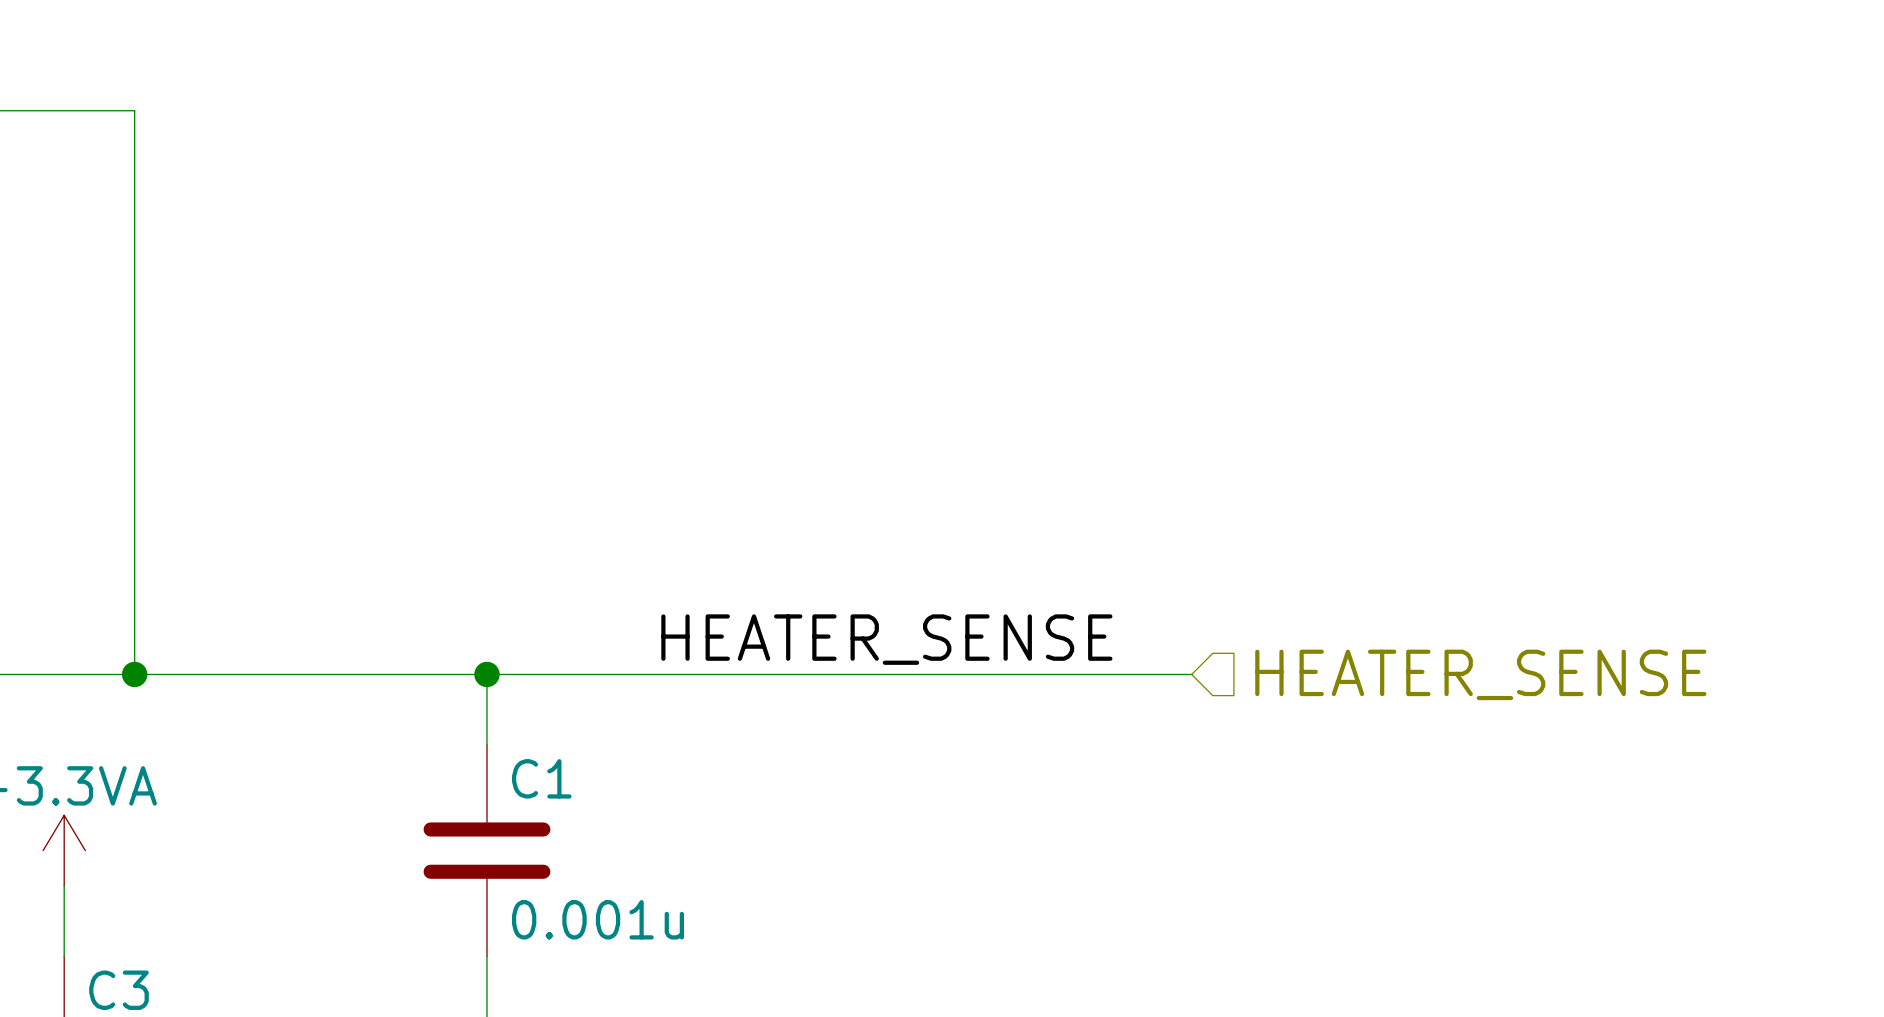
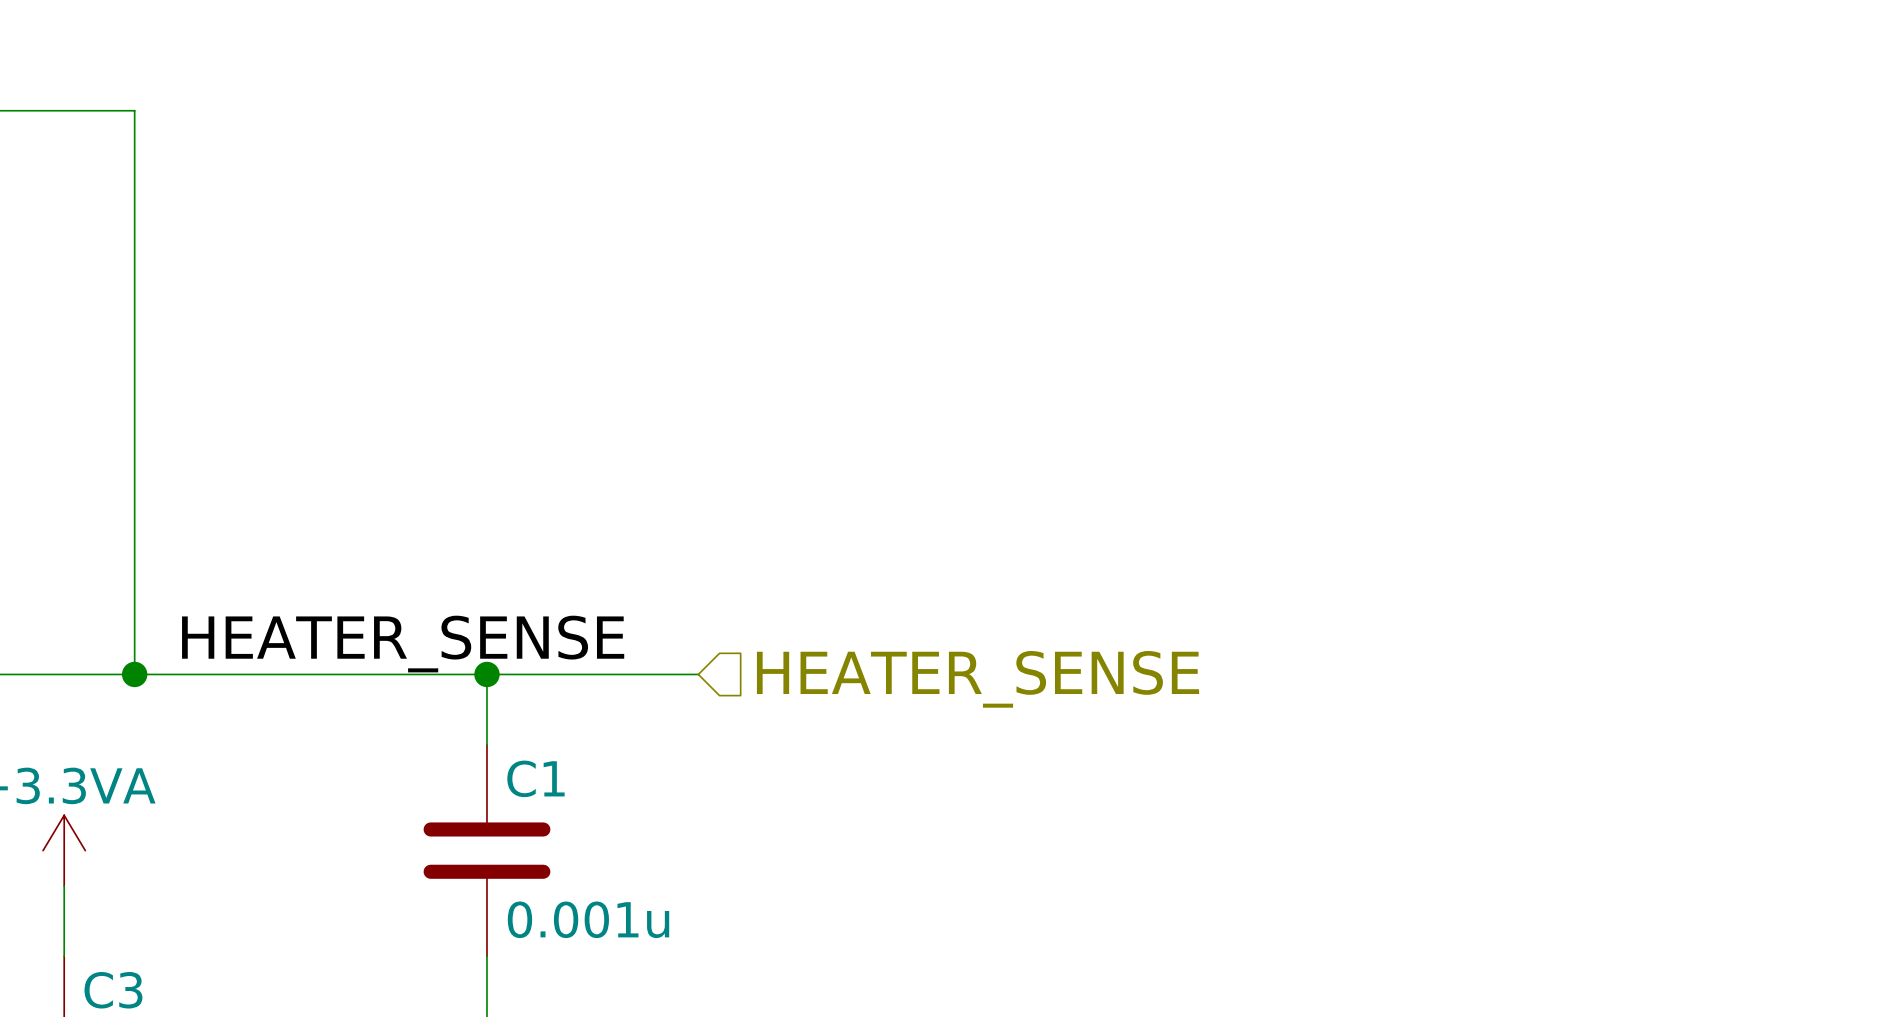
label position: HEATER_SENSE (886, 639) -> HEATER_SENSE (403, 644)
wire: (698, 674) (1191, 674) -> none
hierarchical label position: HEATER_SENSE (1480, 674) -> HEATER_SENSE (978, 679)

